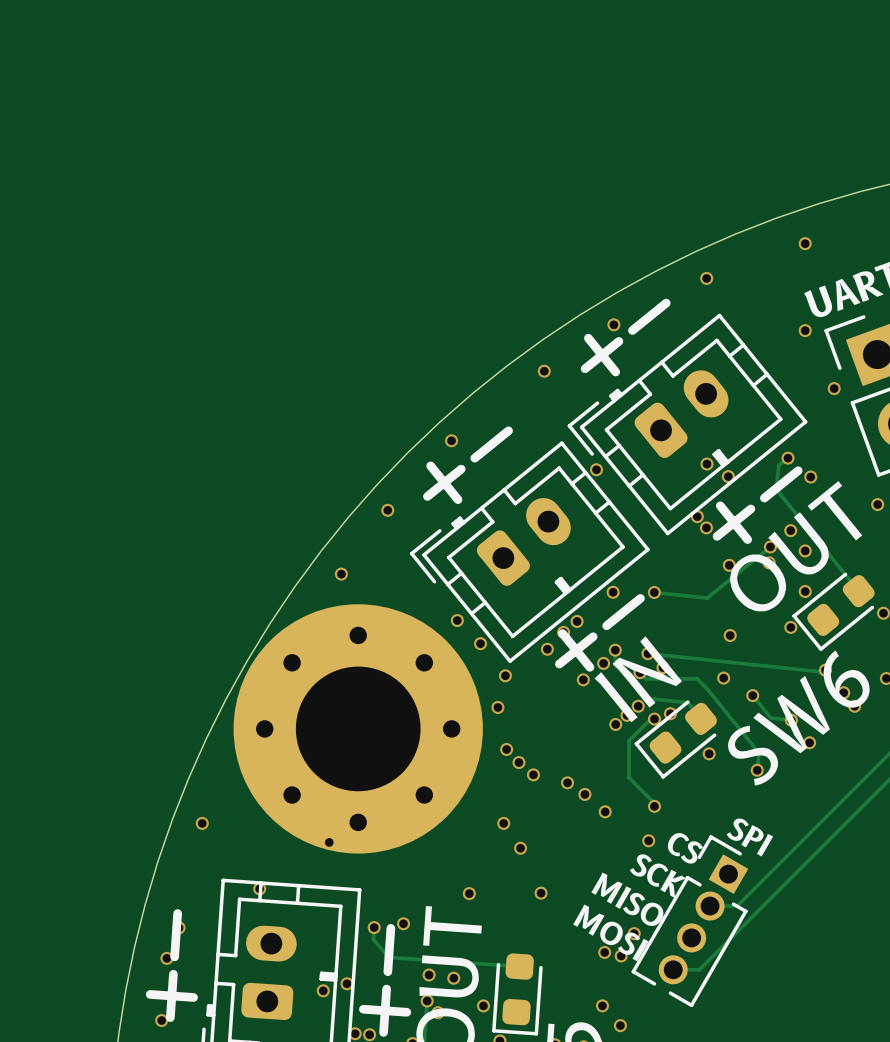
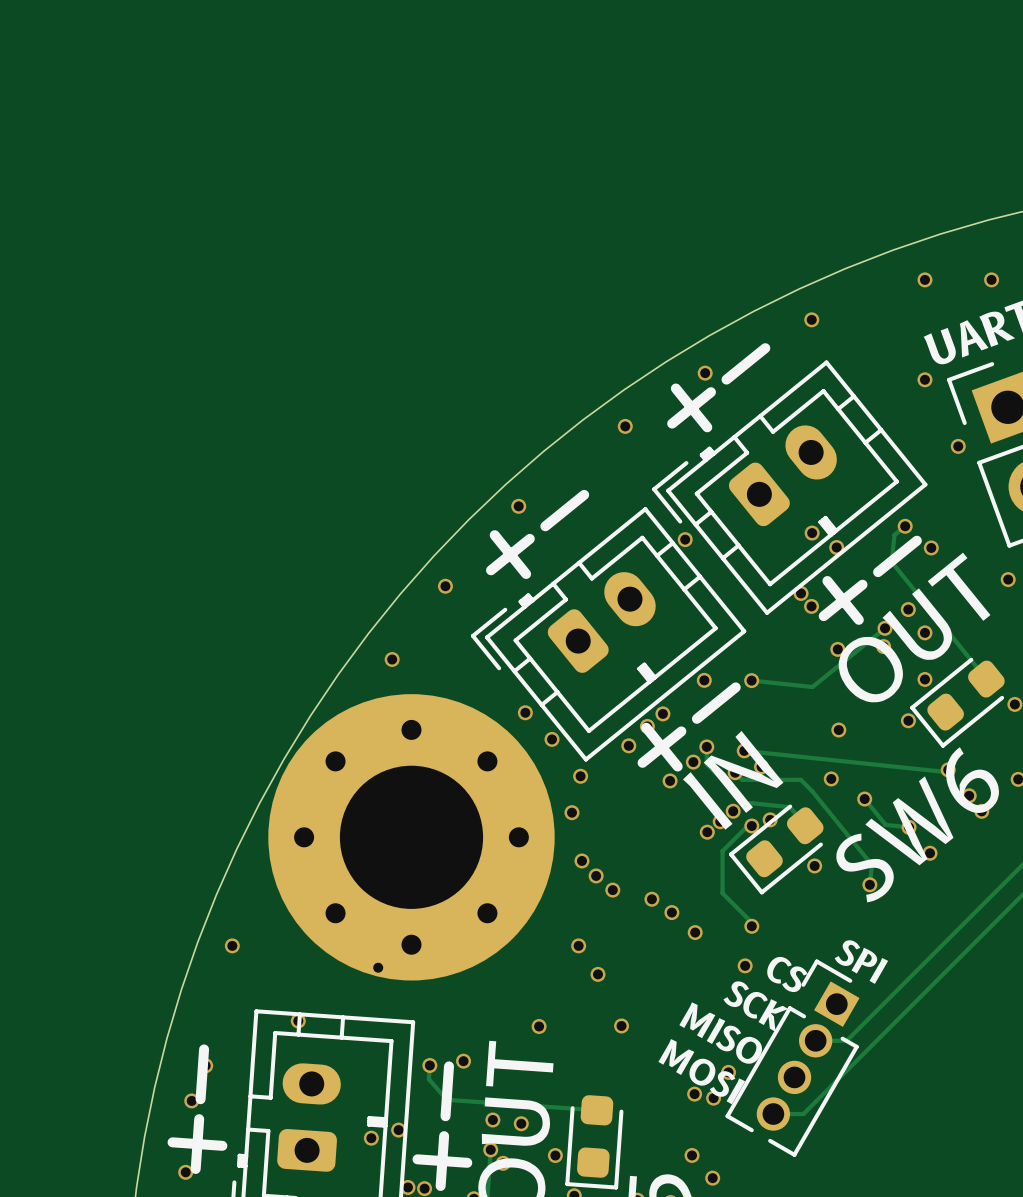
via: none -> (991, 279)

